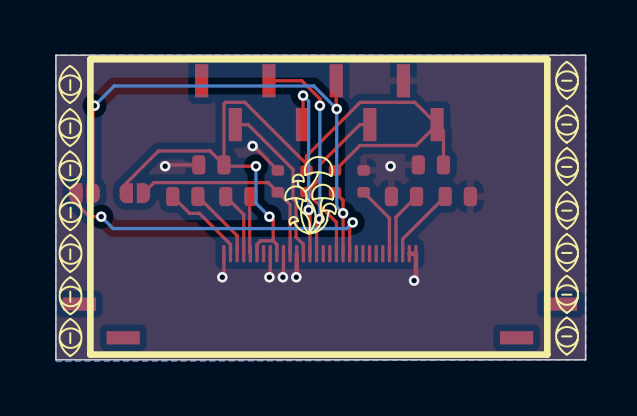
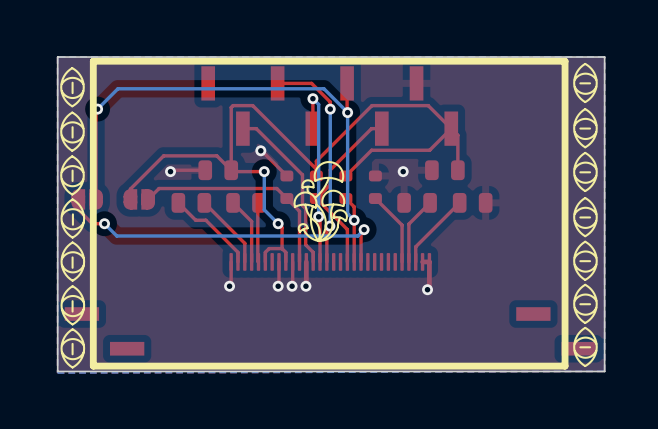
part footprint: [500, 297, 578, 345] -> [516, 307, 596, 356]

